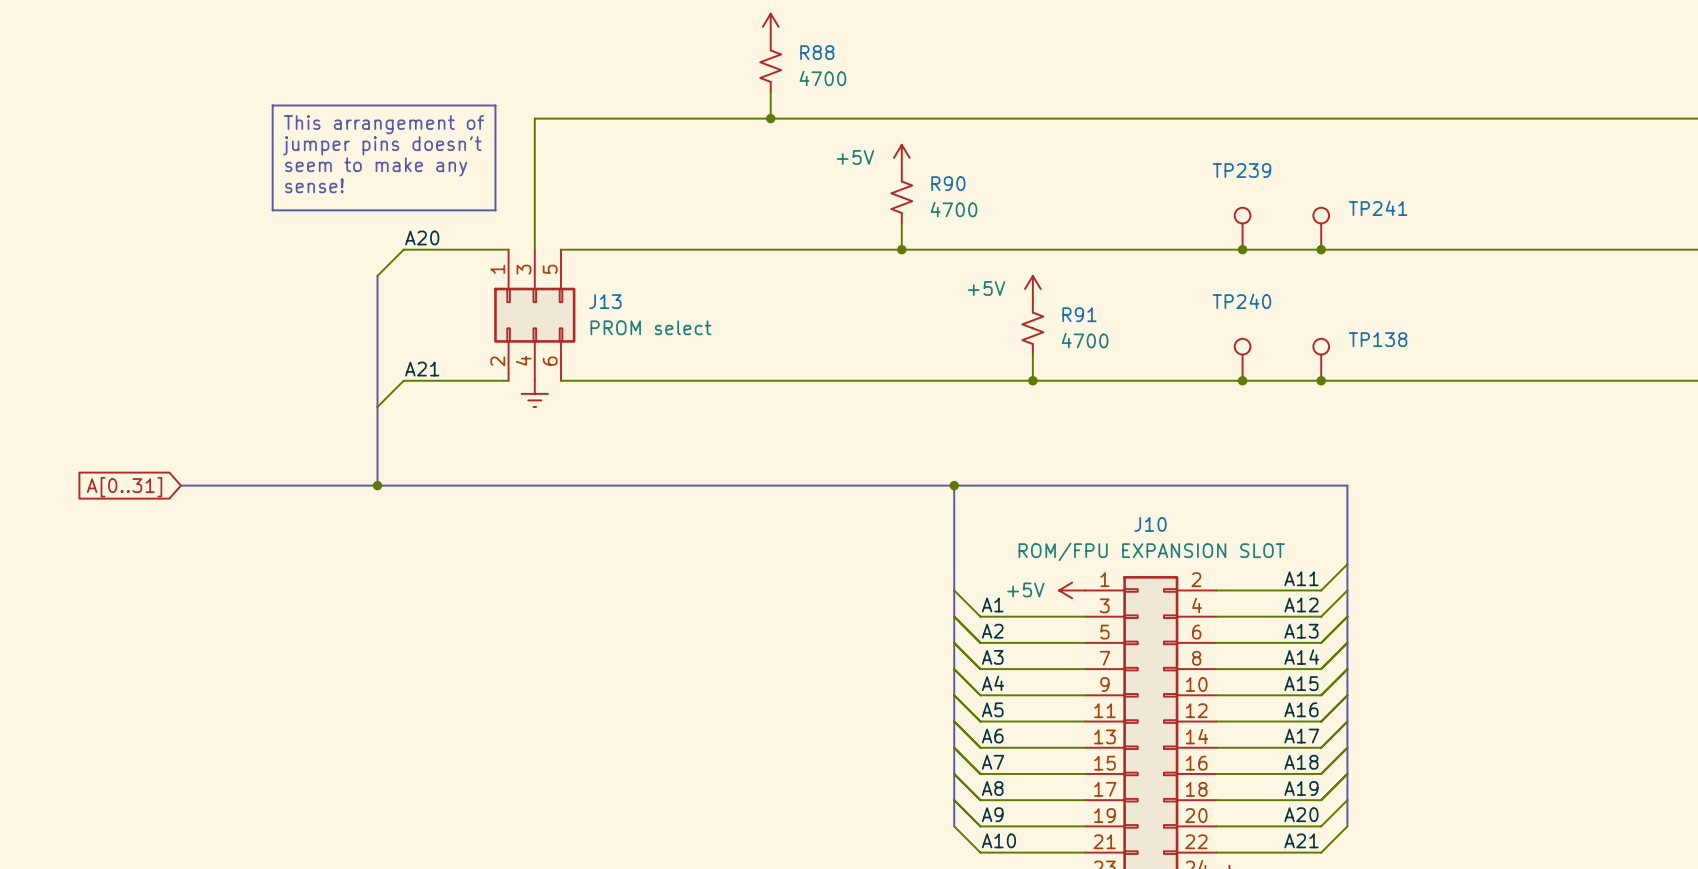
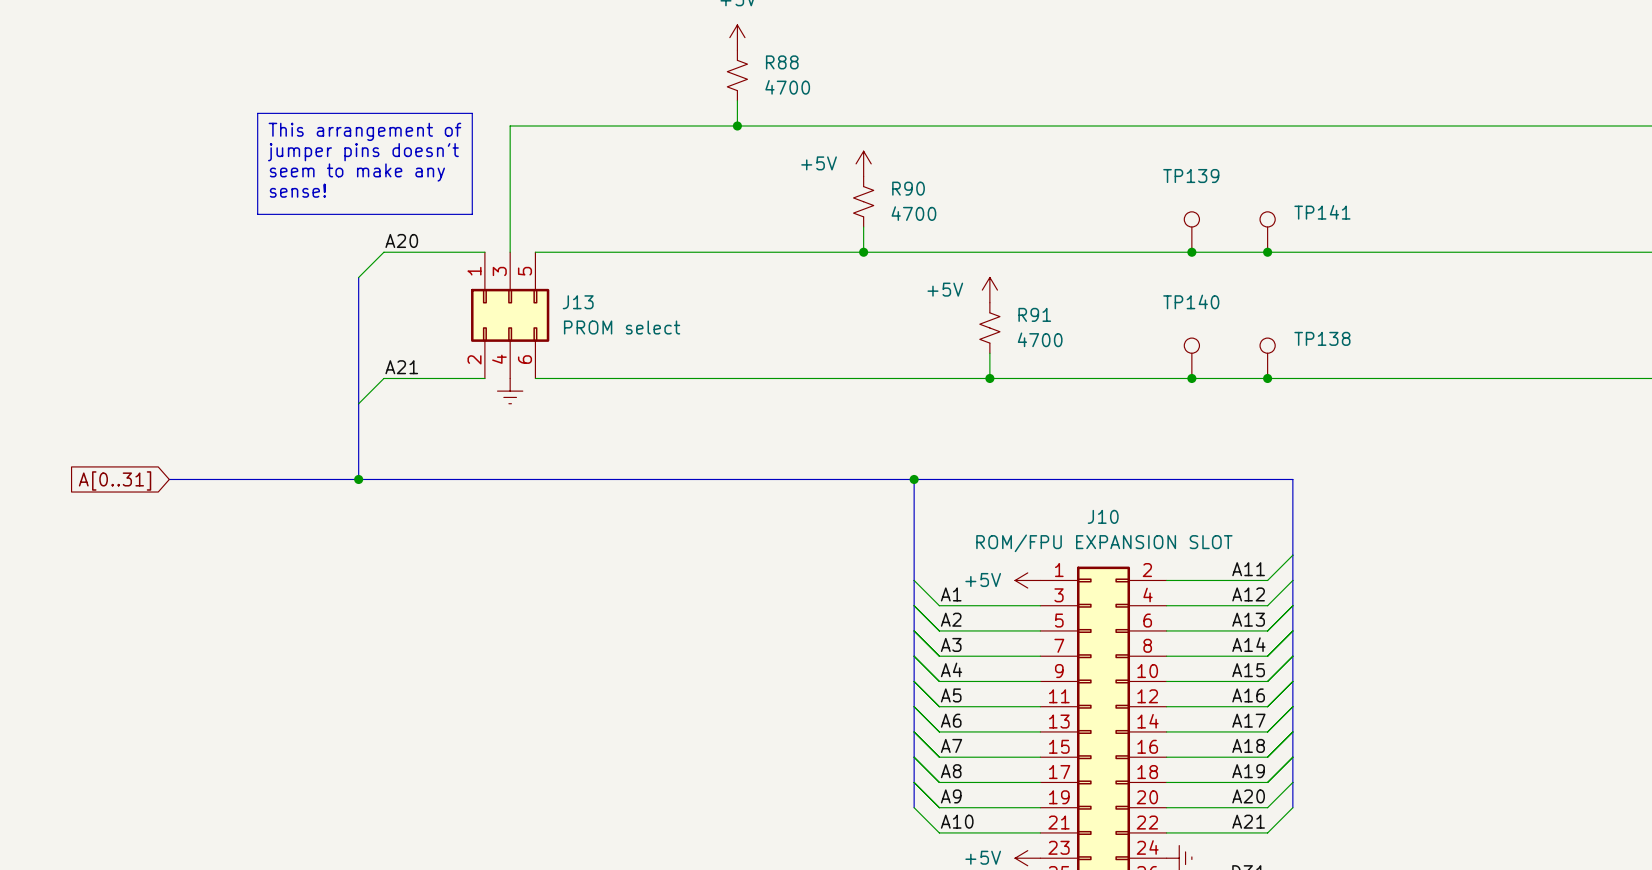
TP239 name: TP239 (1241, 170) -> TP139 (1191, 176)
TP241 name: TP241 (1378, 208) -> TP141 (1322, 212)
TP240 name: TP240 (1241, 301) -> TP140 (1191, 301)

